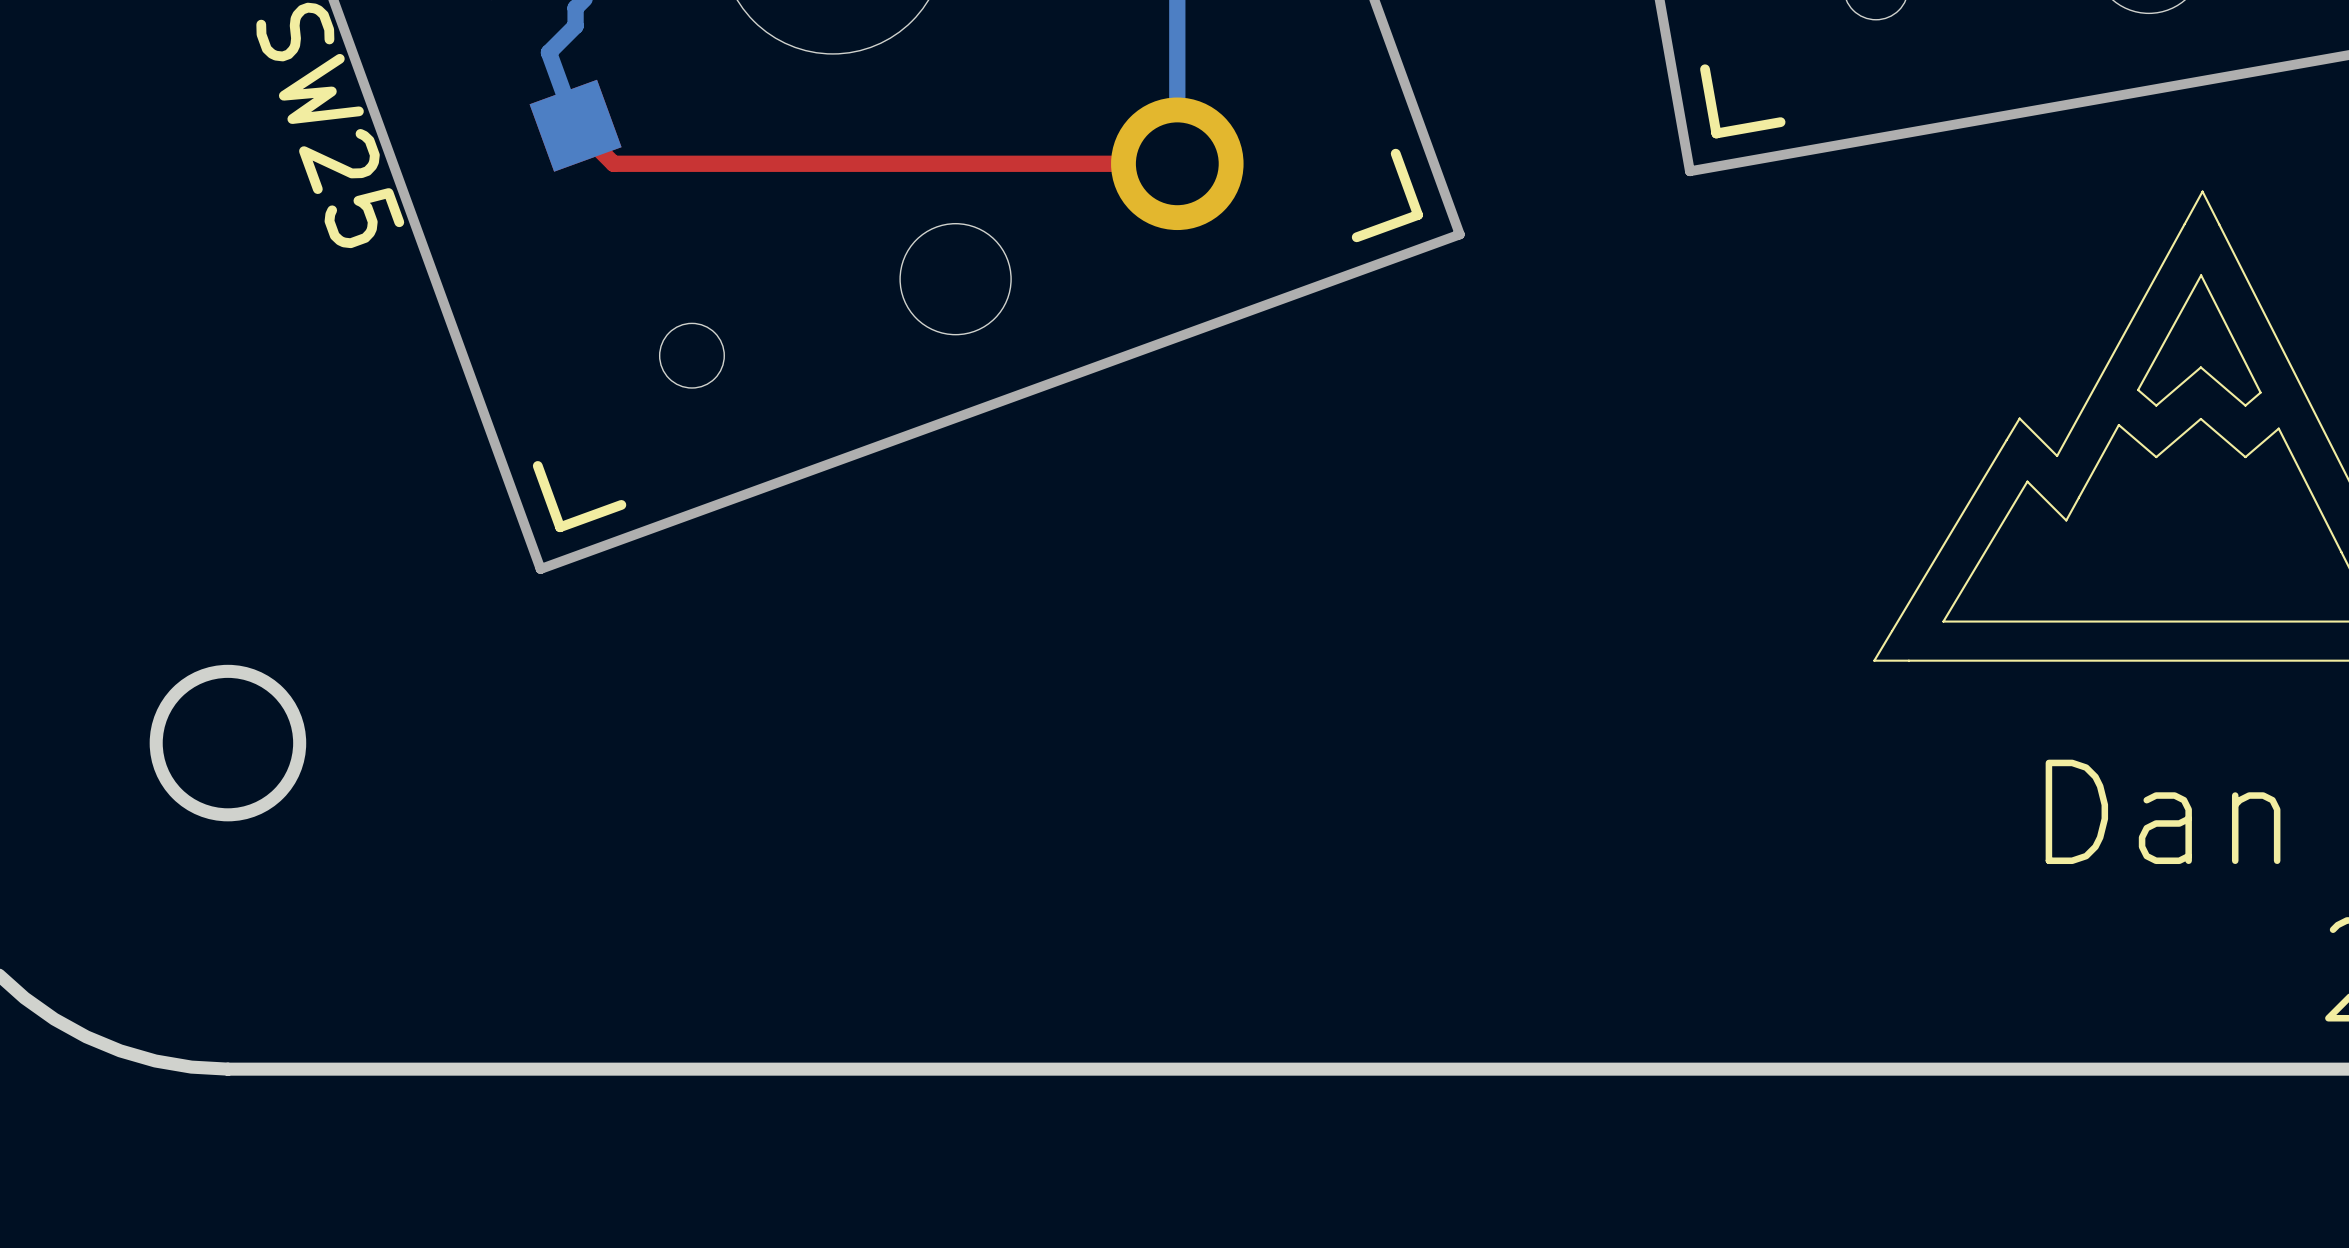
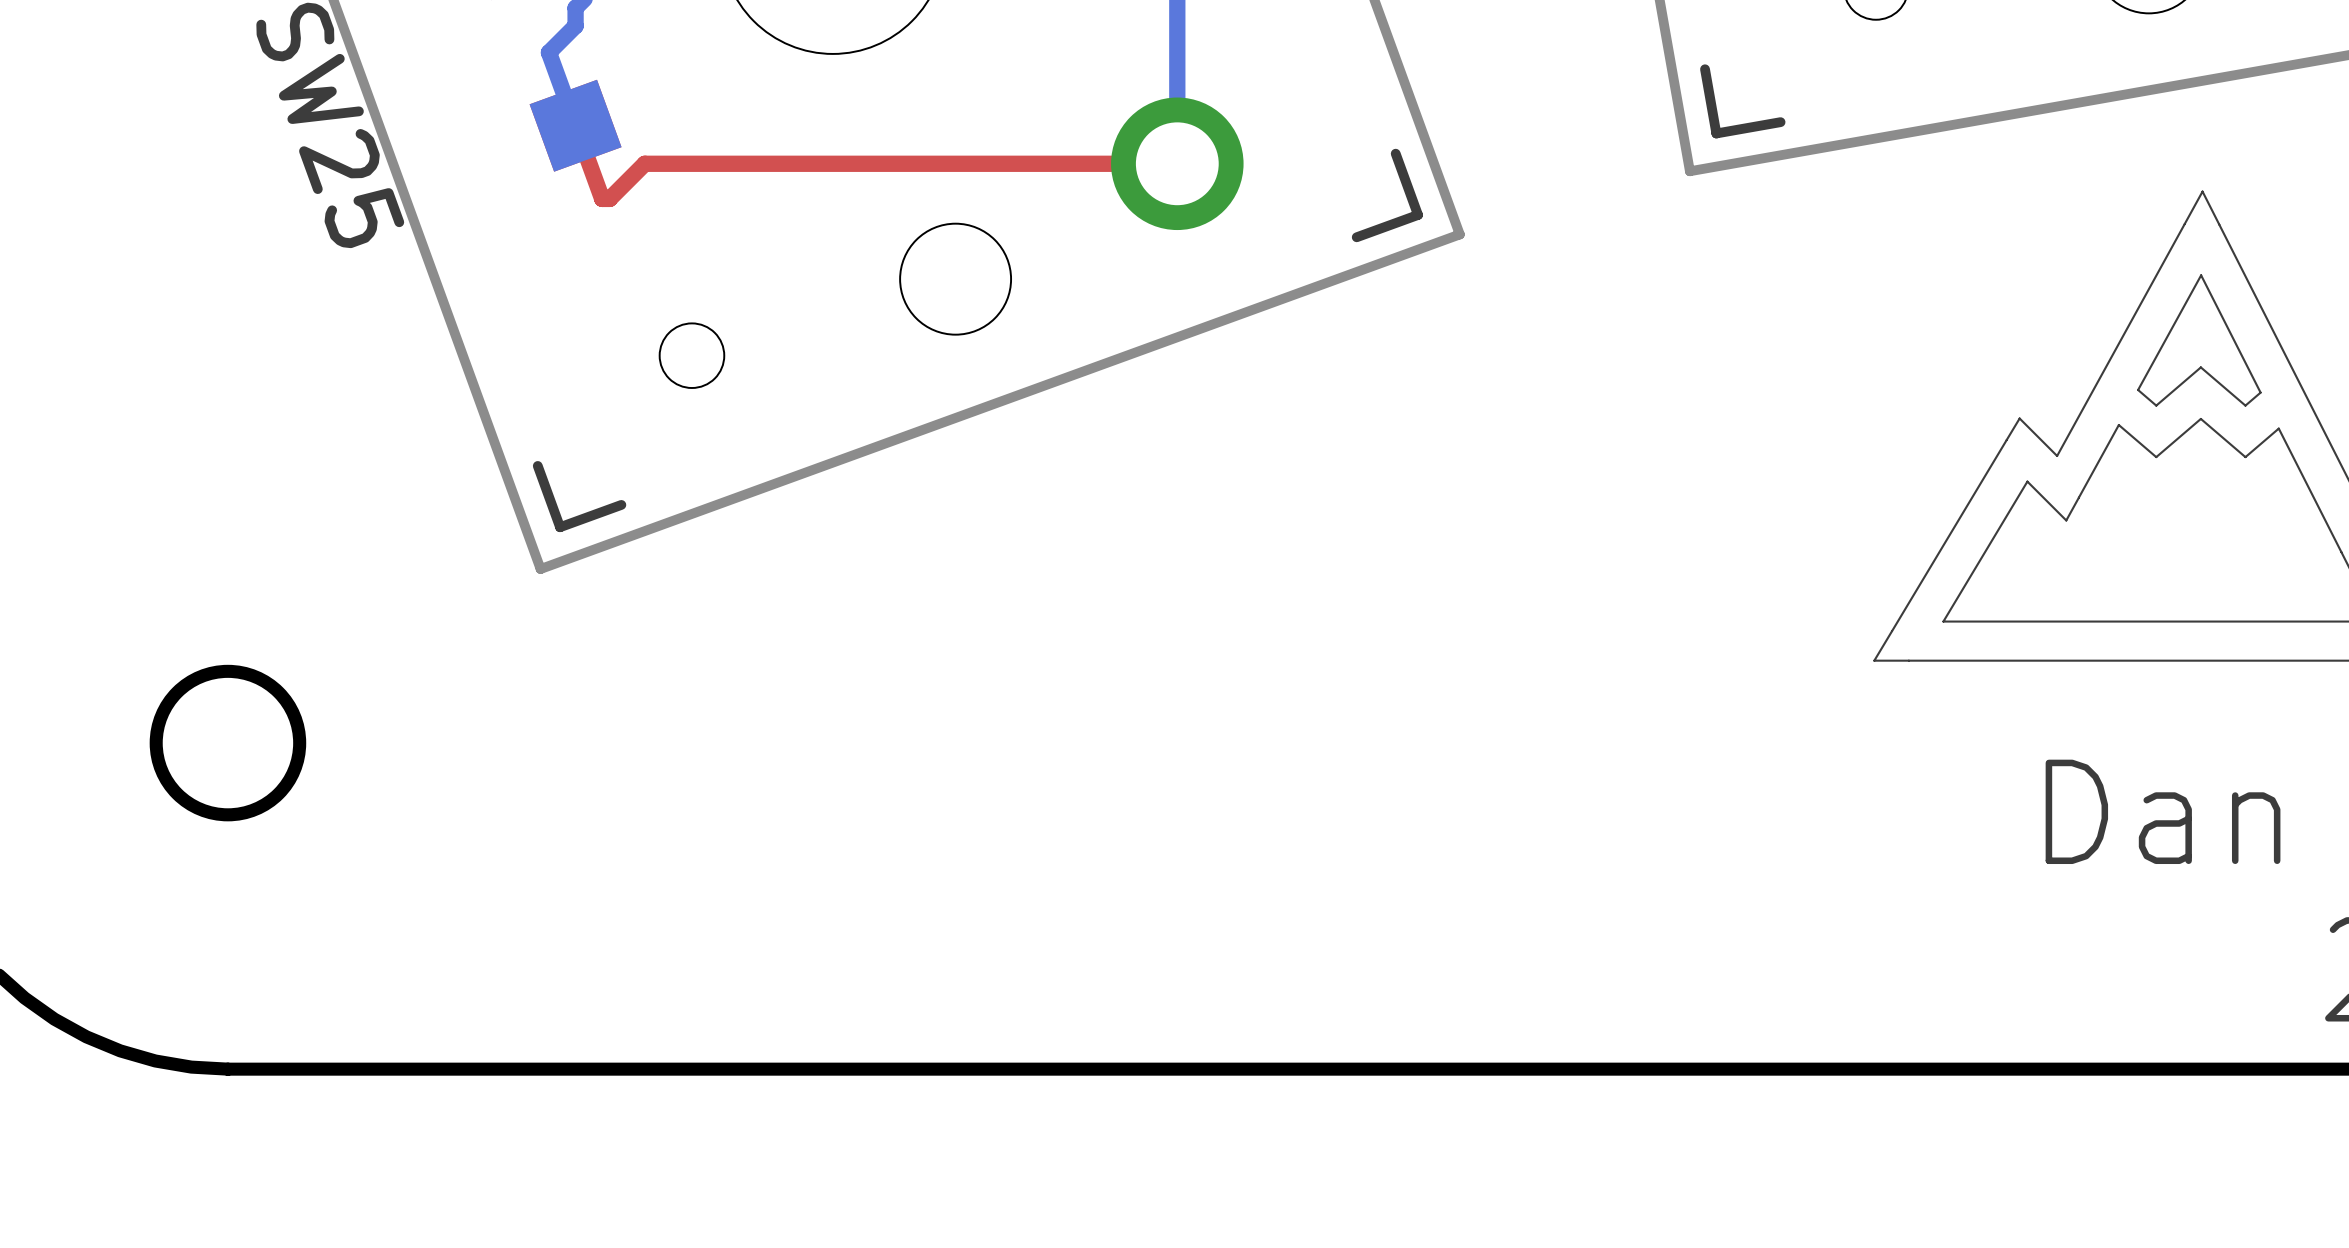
top track: (575, 125) (613, 163) (644, 163) -> (575, 125) (602, 198) (609, 198) (644, 163)

